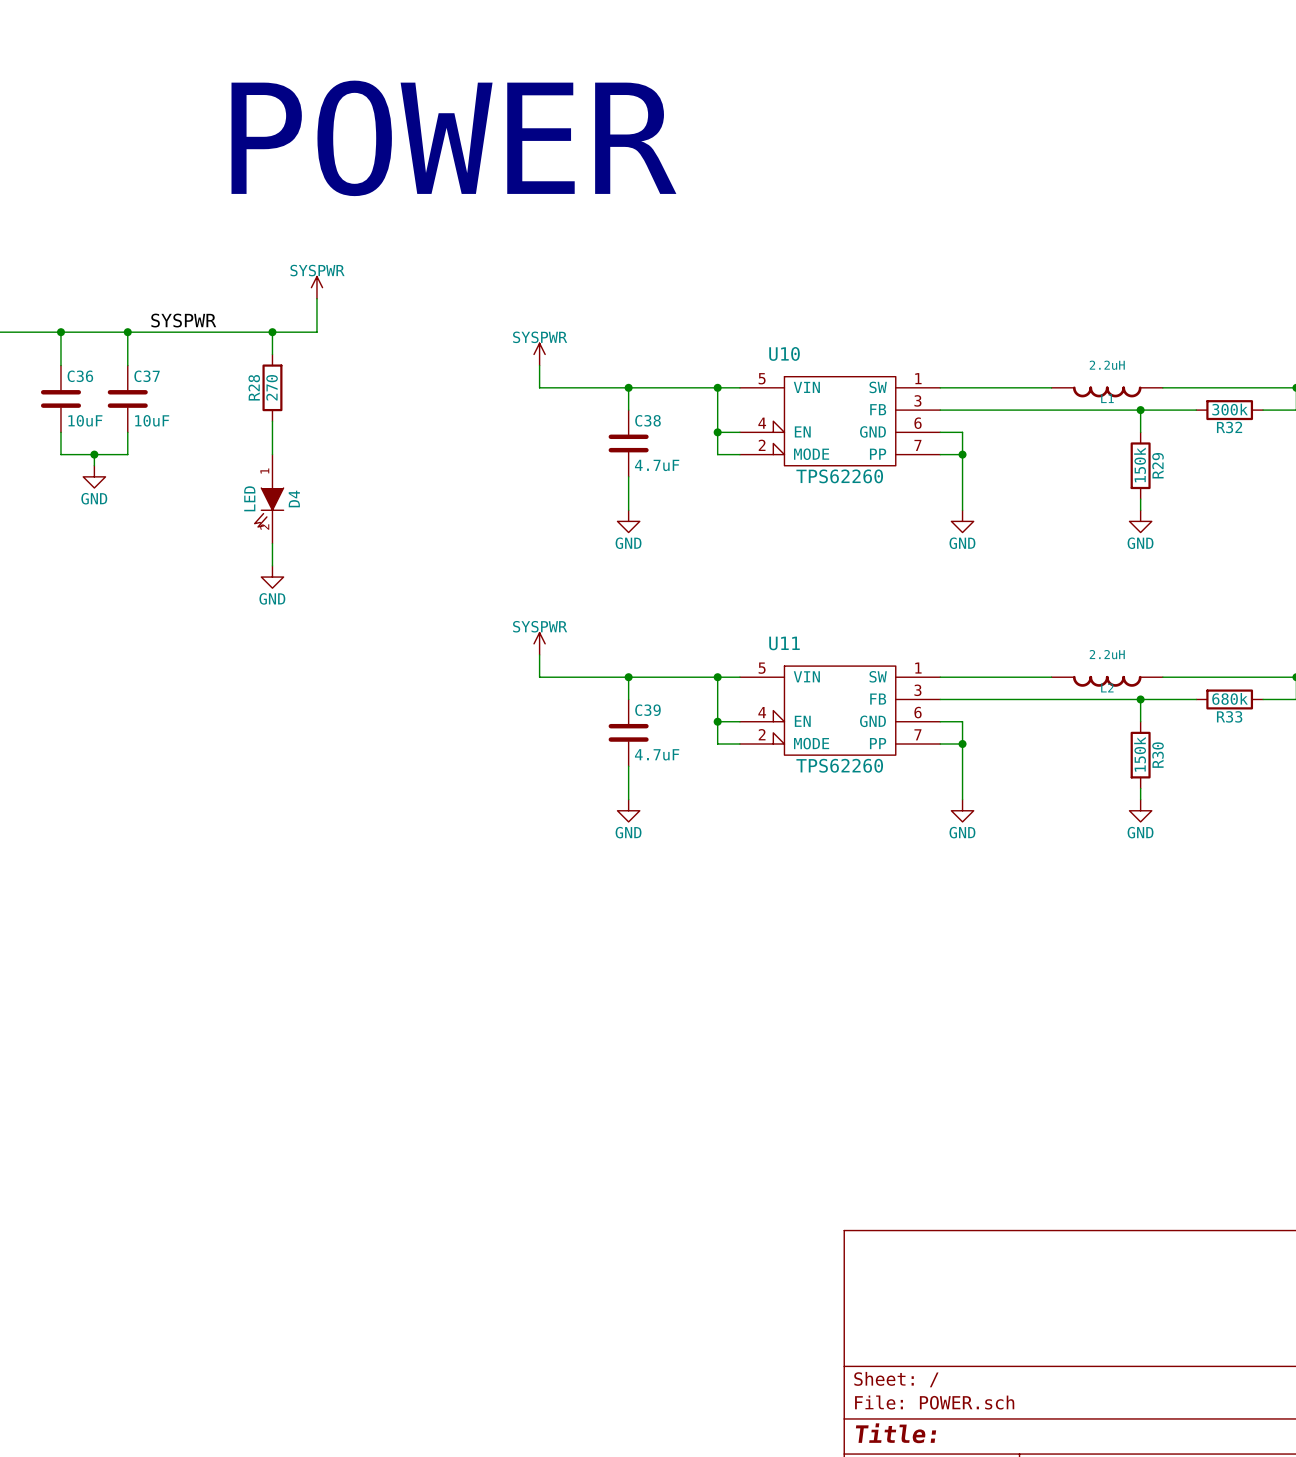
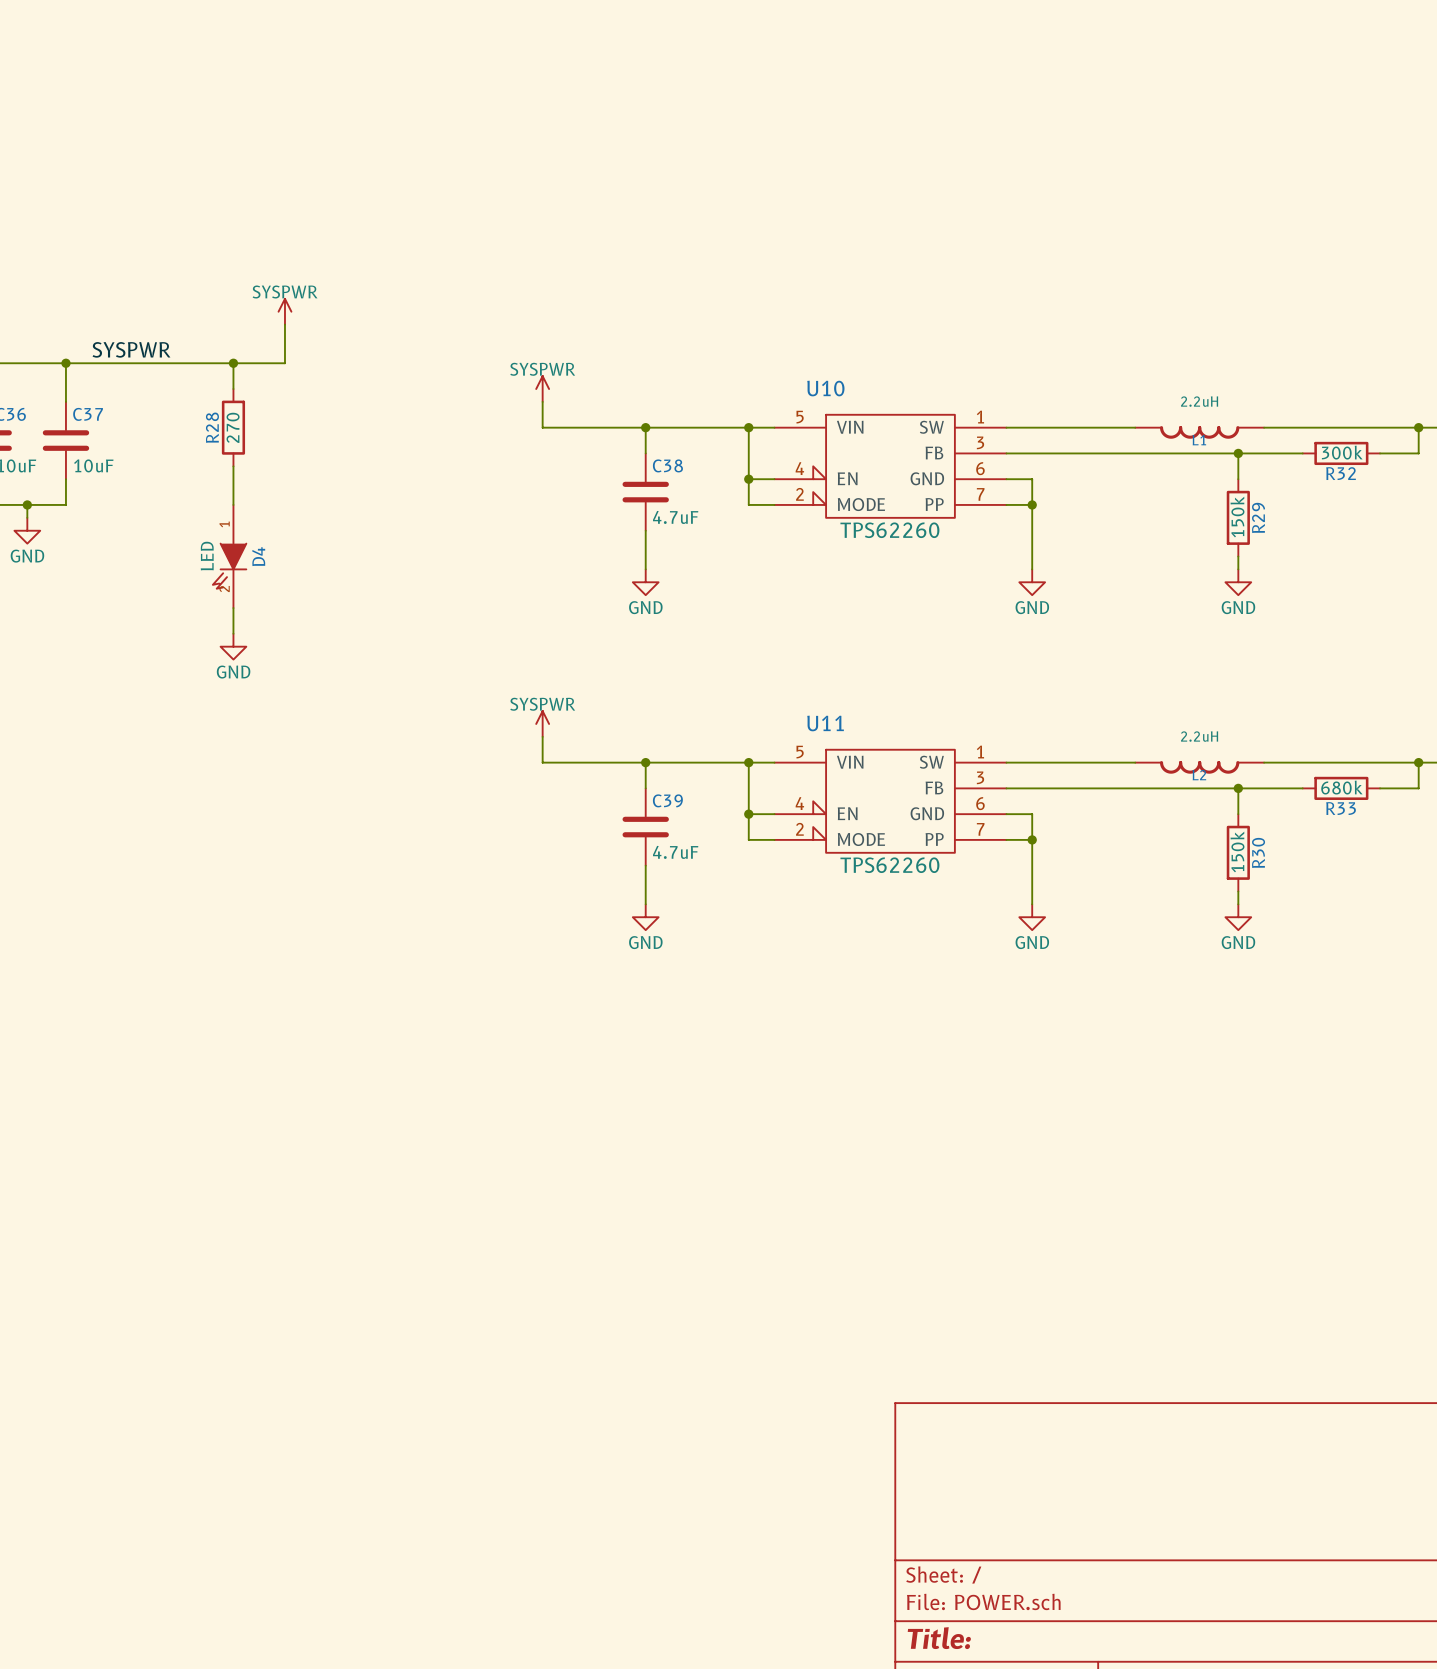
text: POWER (453, 138) -> none

